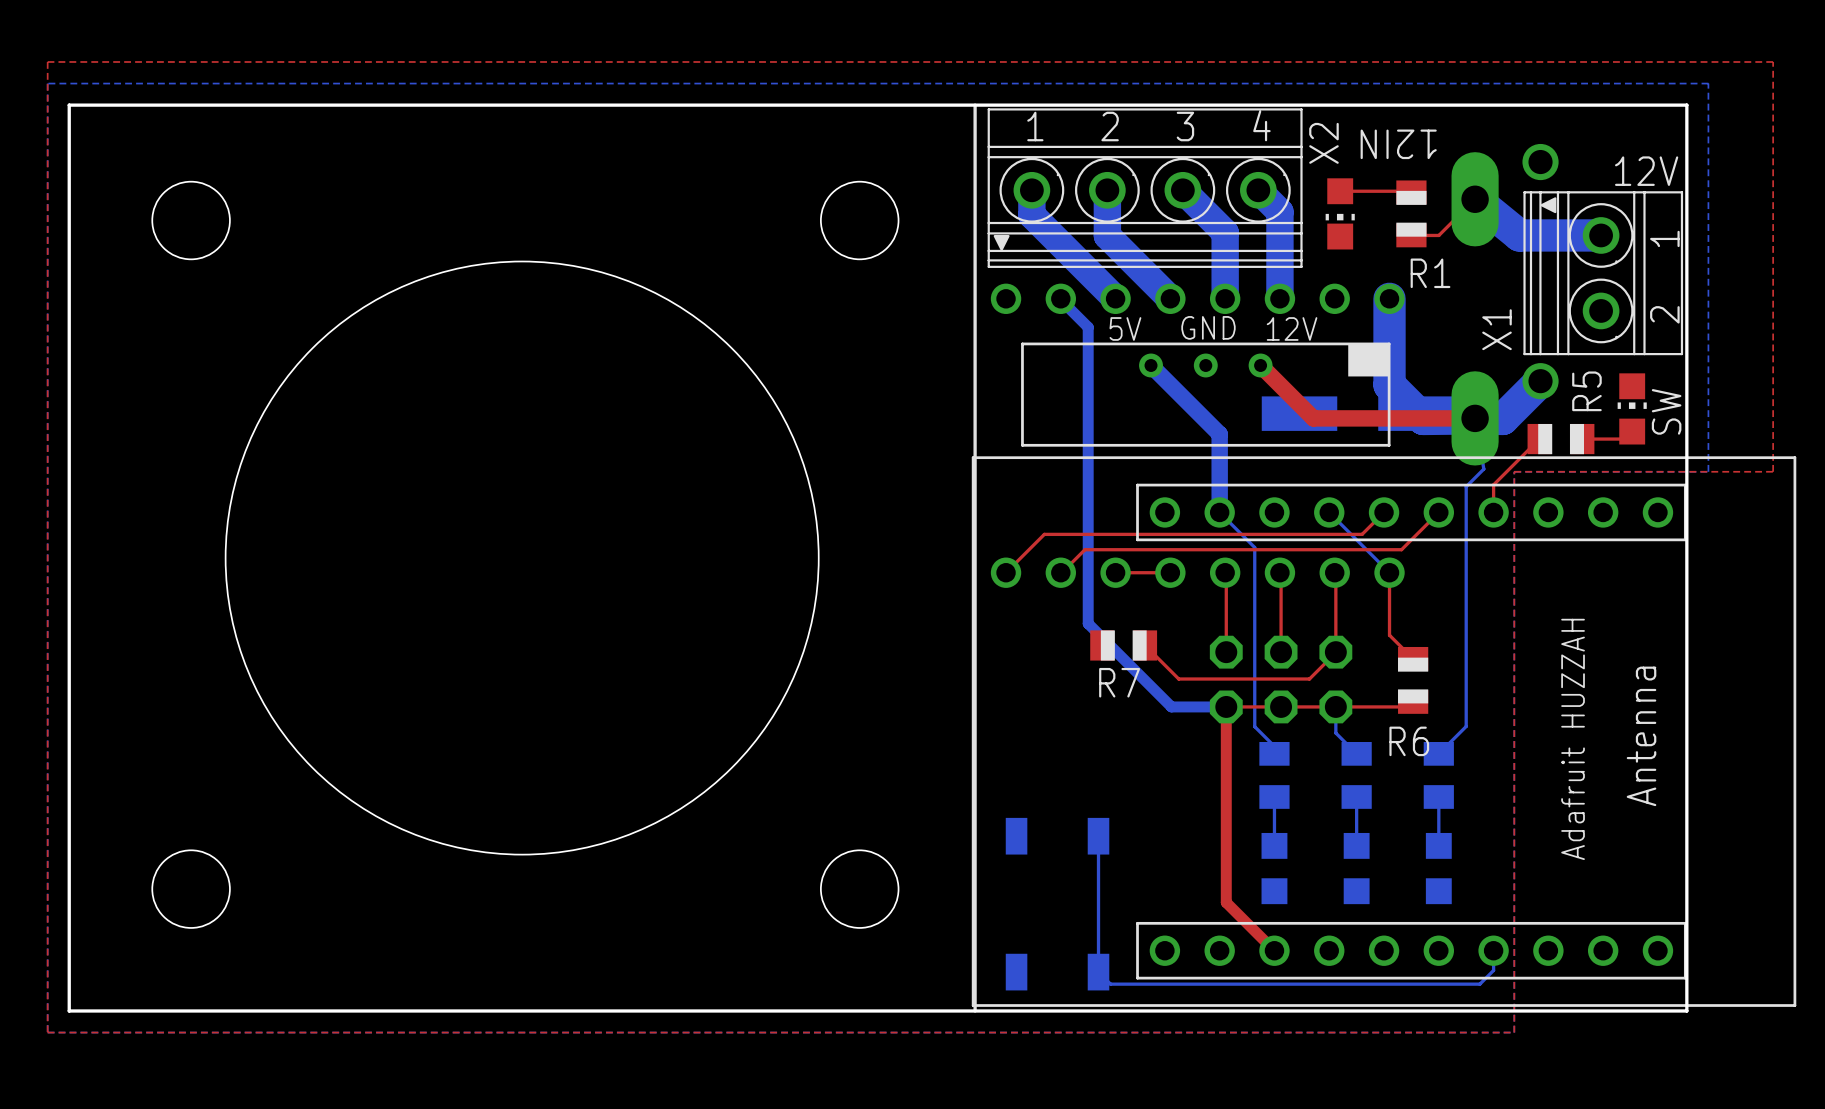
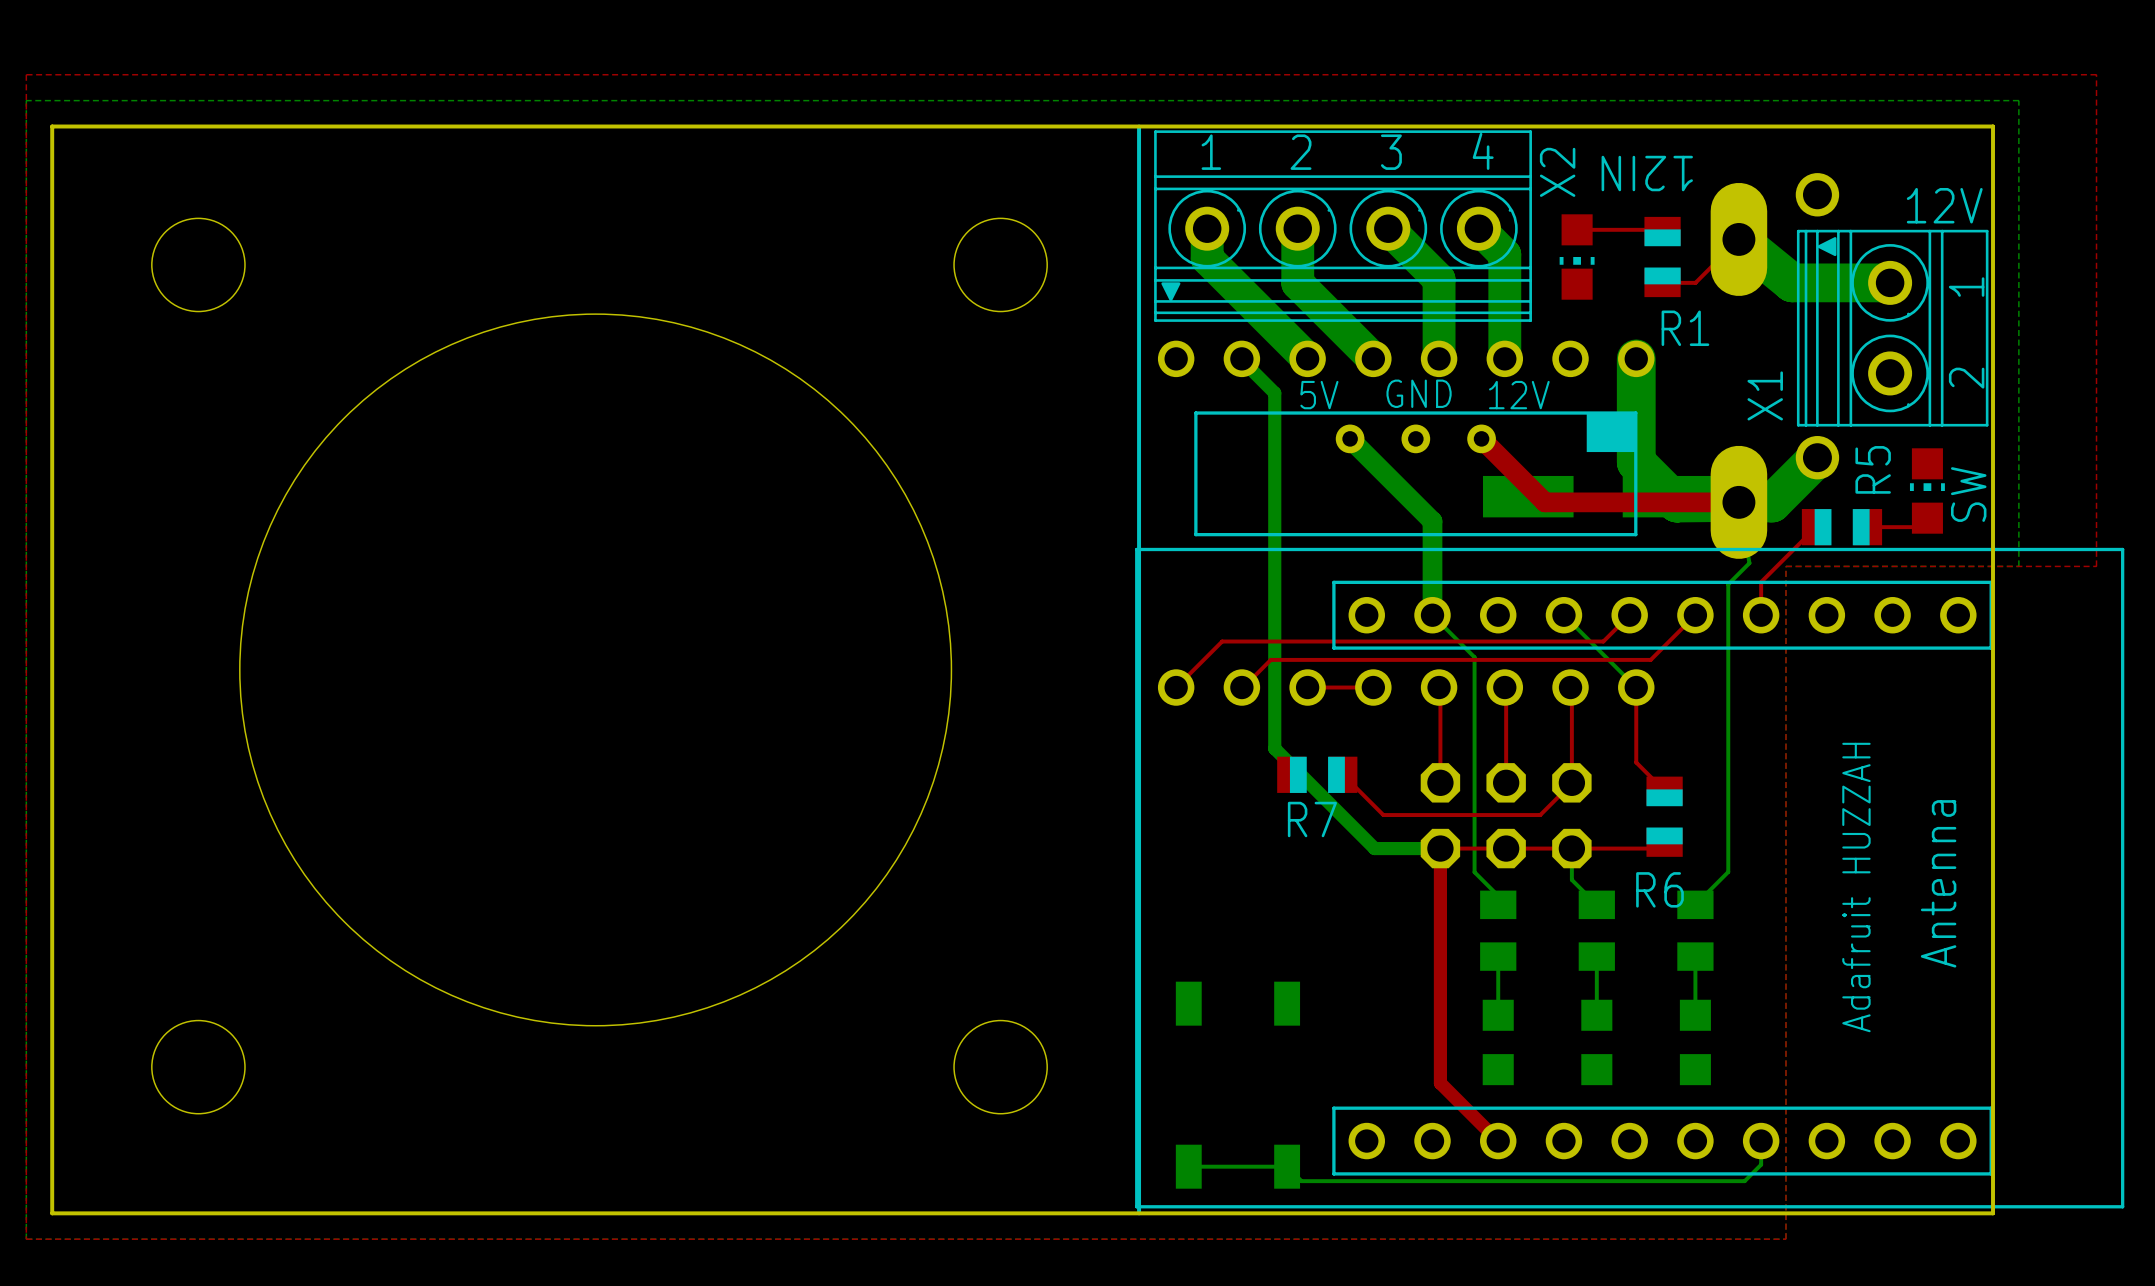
bottom track: (1098, 836) (1098, 972) -> (1188, 1166) (1287, 1166)

